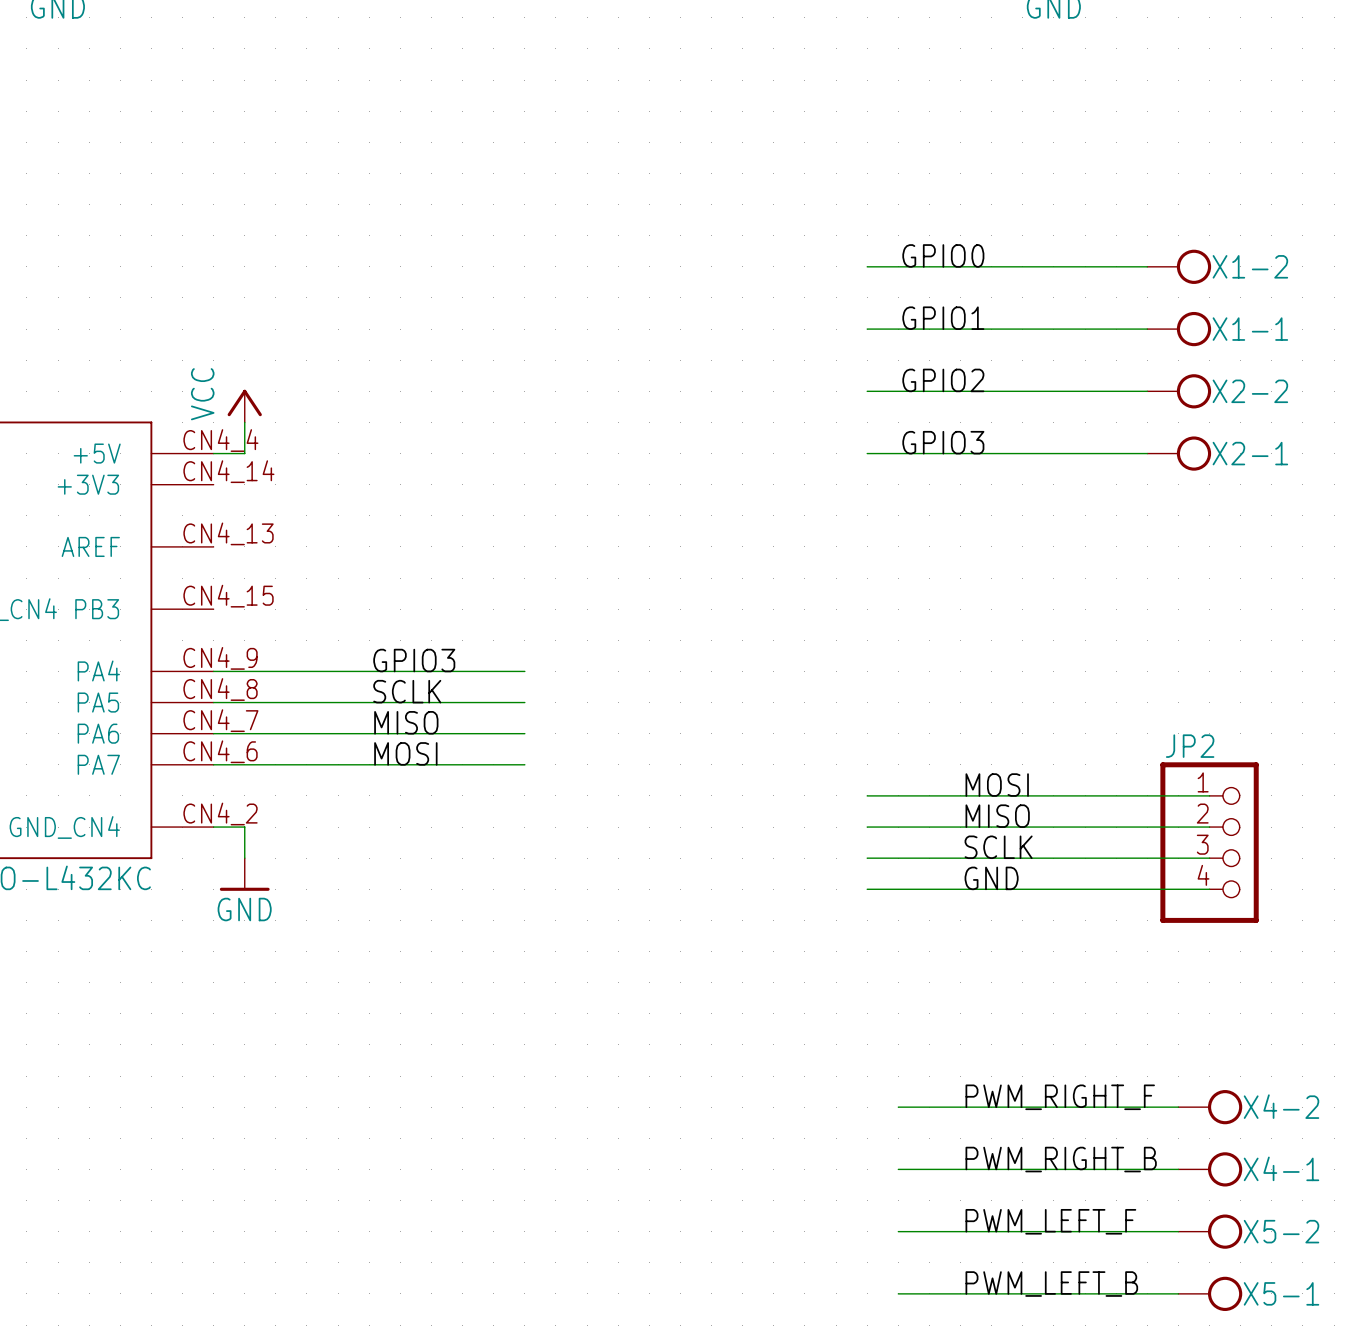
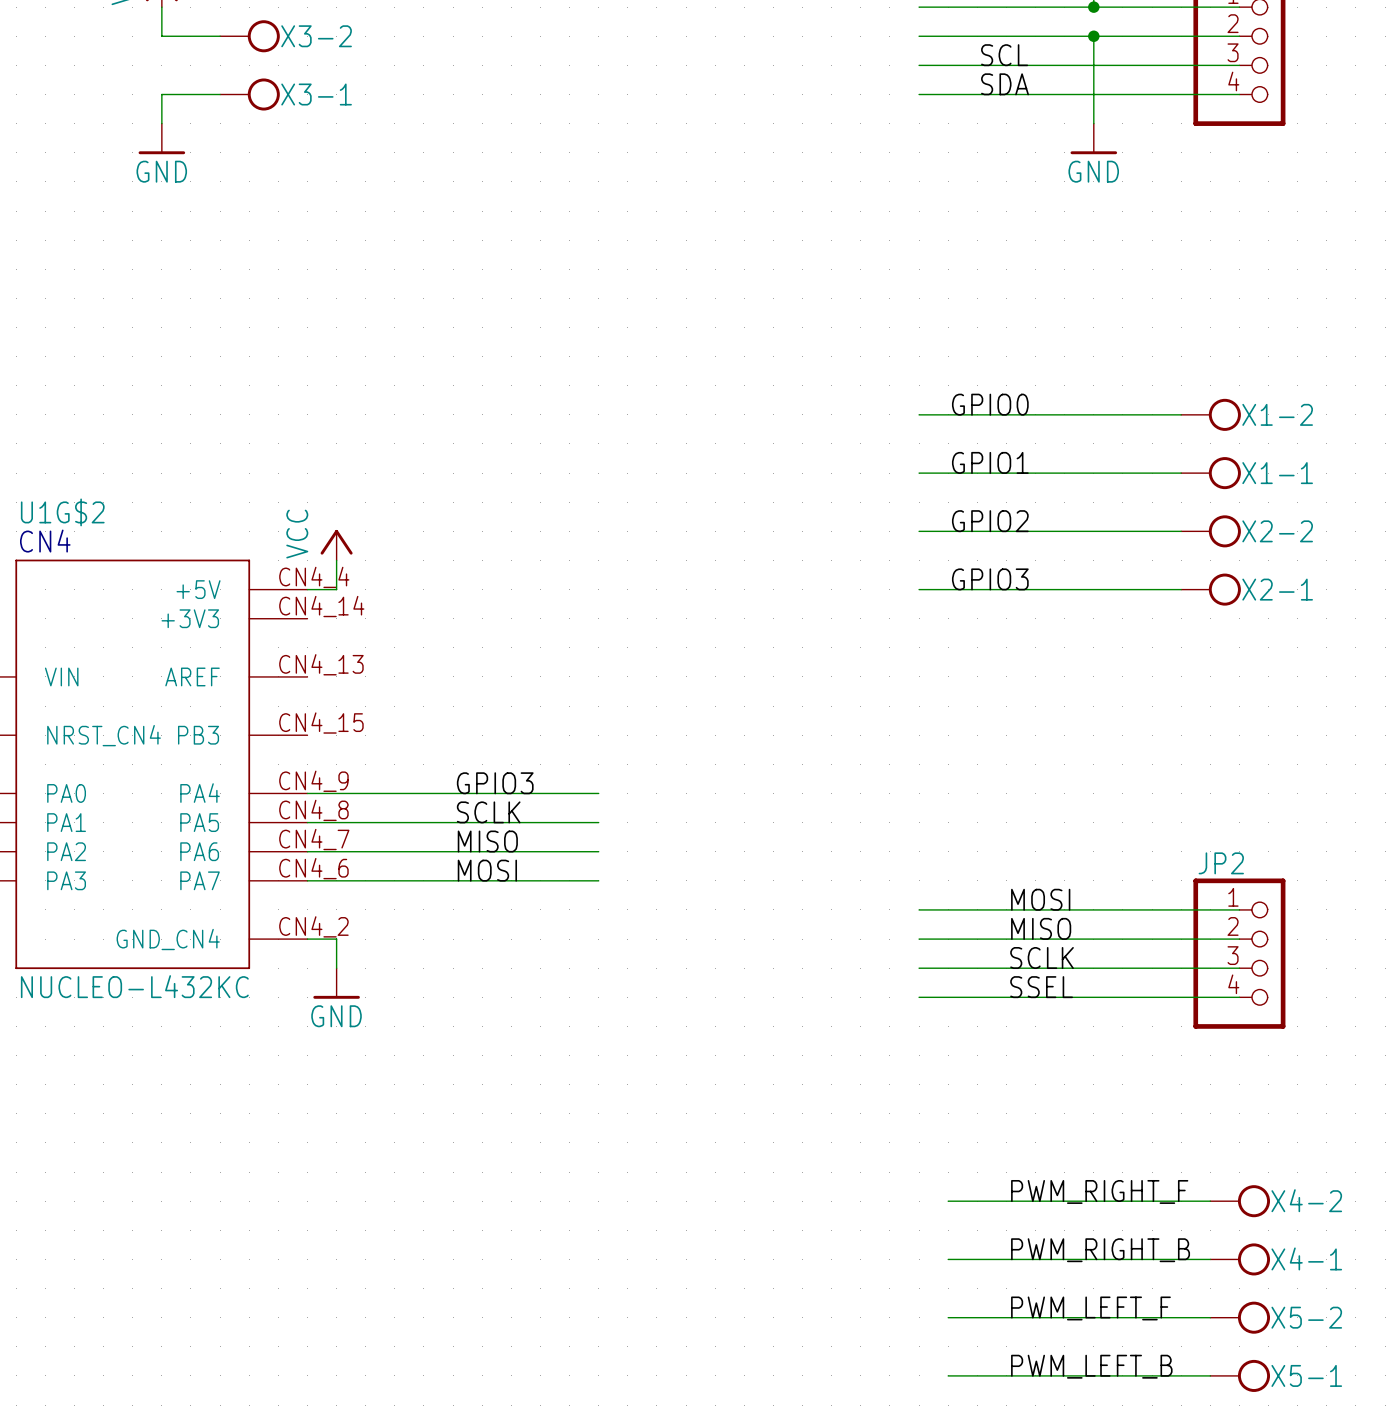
label: GND (991, 878) -> SSEL (1041, 987)

